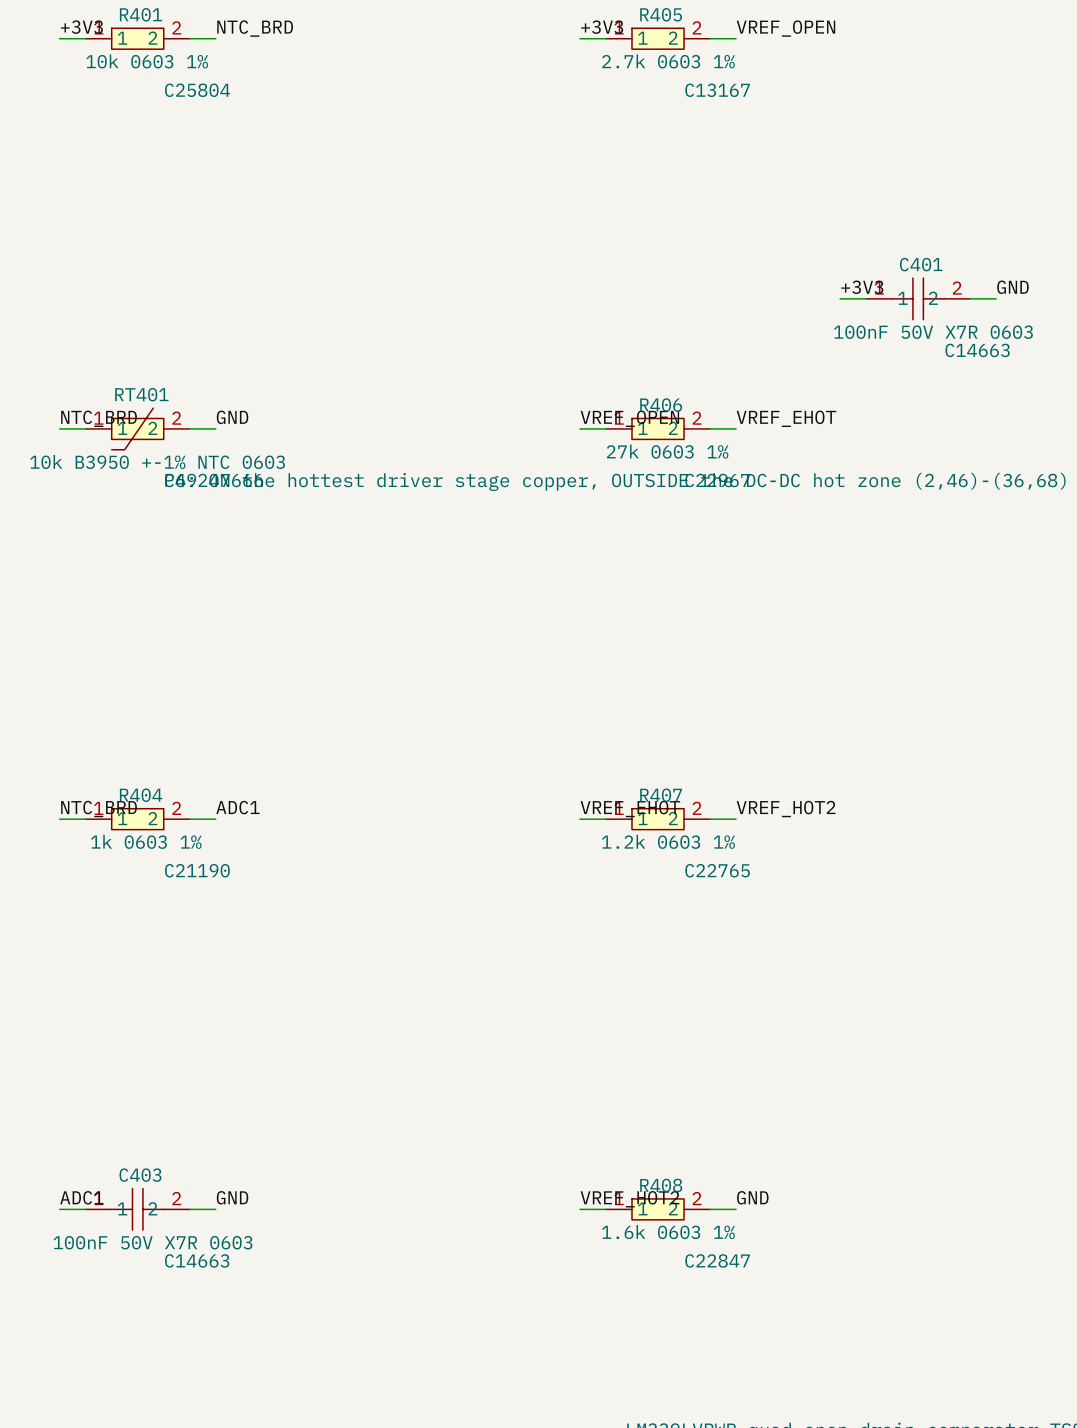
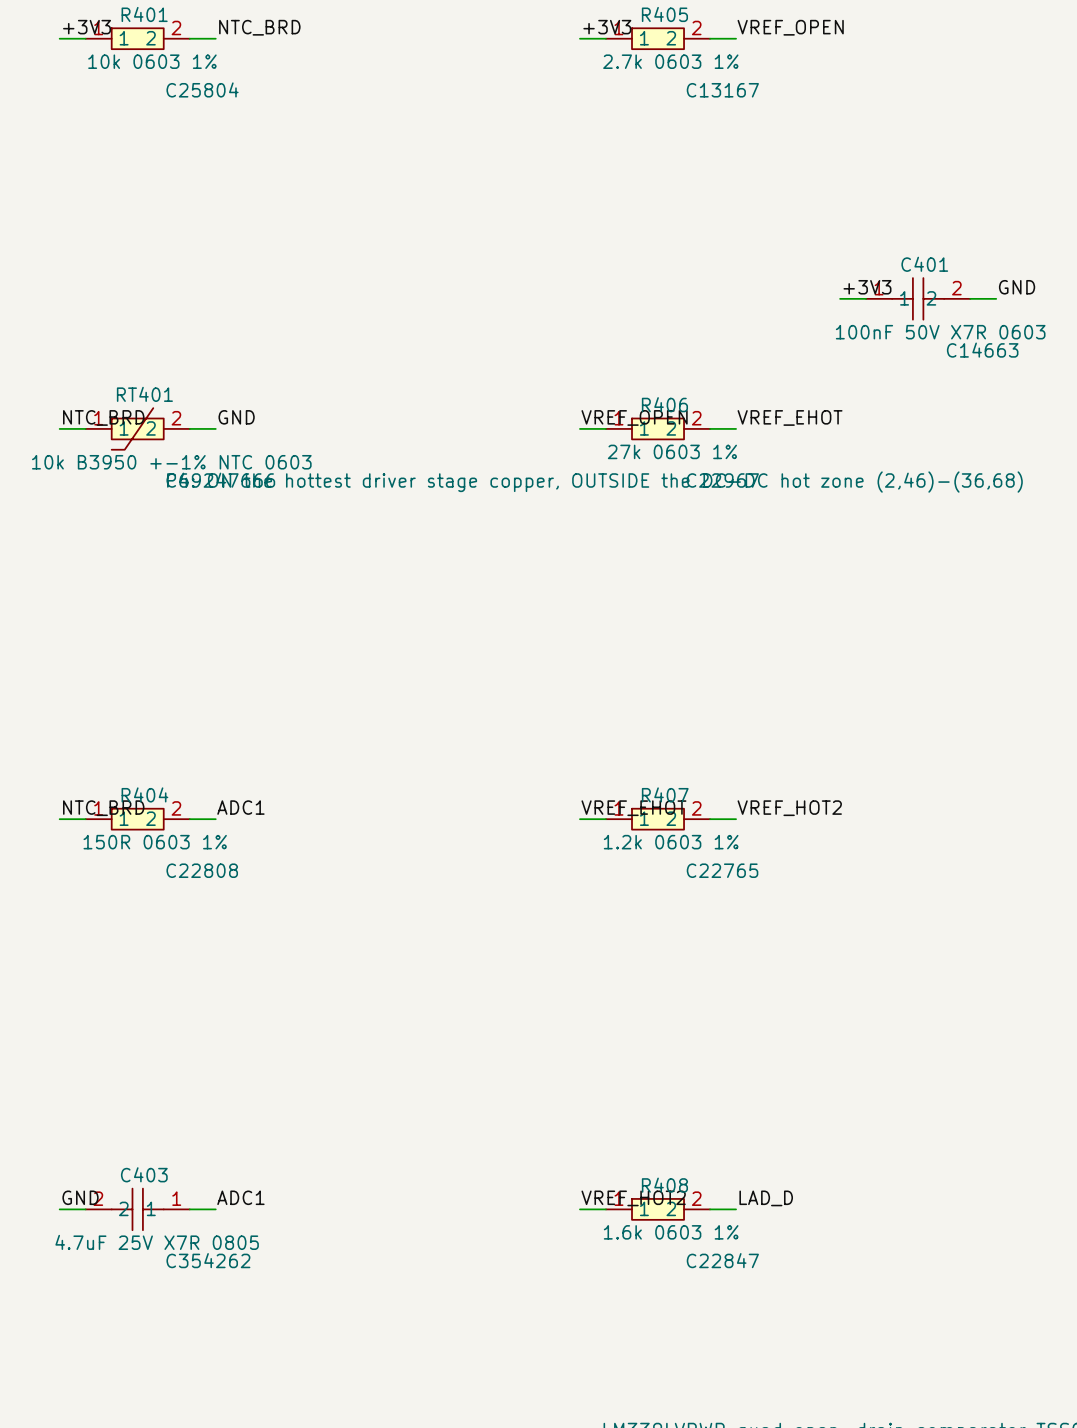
R404 value: 1k 0603 1% (146, 841) -> 150R 0603 1% (155, 842)
R404 text: C21190 (197, 870) -> C22808 (202, 870)
label: ADC1 (81, 1197) -> GND (80, 1197)
label: GND (232, 1197) -> ADC1 (240, 1197)
label: GND (752, 1197) -> LAD_D (766, 1198)
C403 rotation: 0° (137, 1209) -> 180° (137, 1209)
C403 value: 100nF 50V X7R 0603 (153, 1242) -> 4.7uF 25V X7R 0805 (157, 1242)
C403 text: C14663 (197, 1260) -> C354262 (208, 1260)

